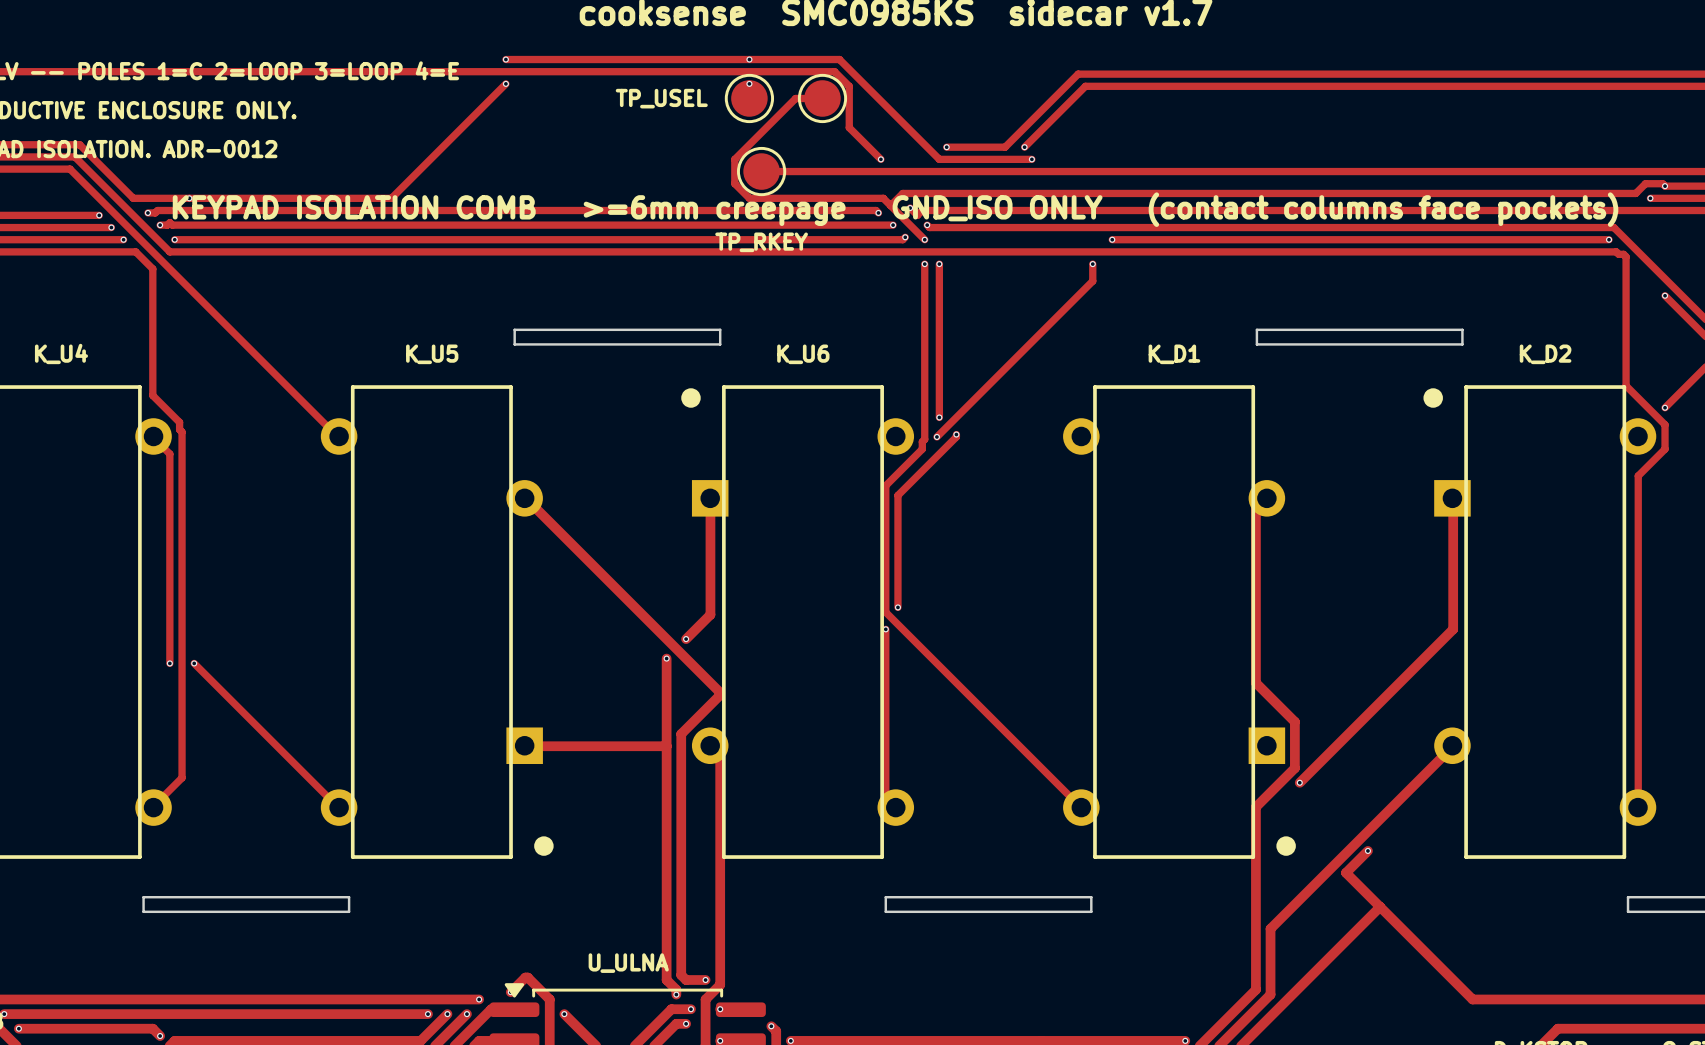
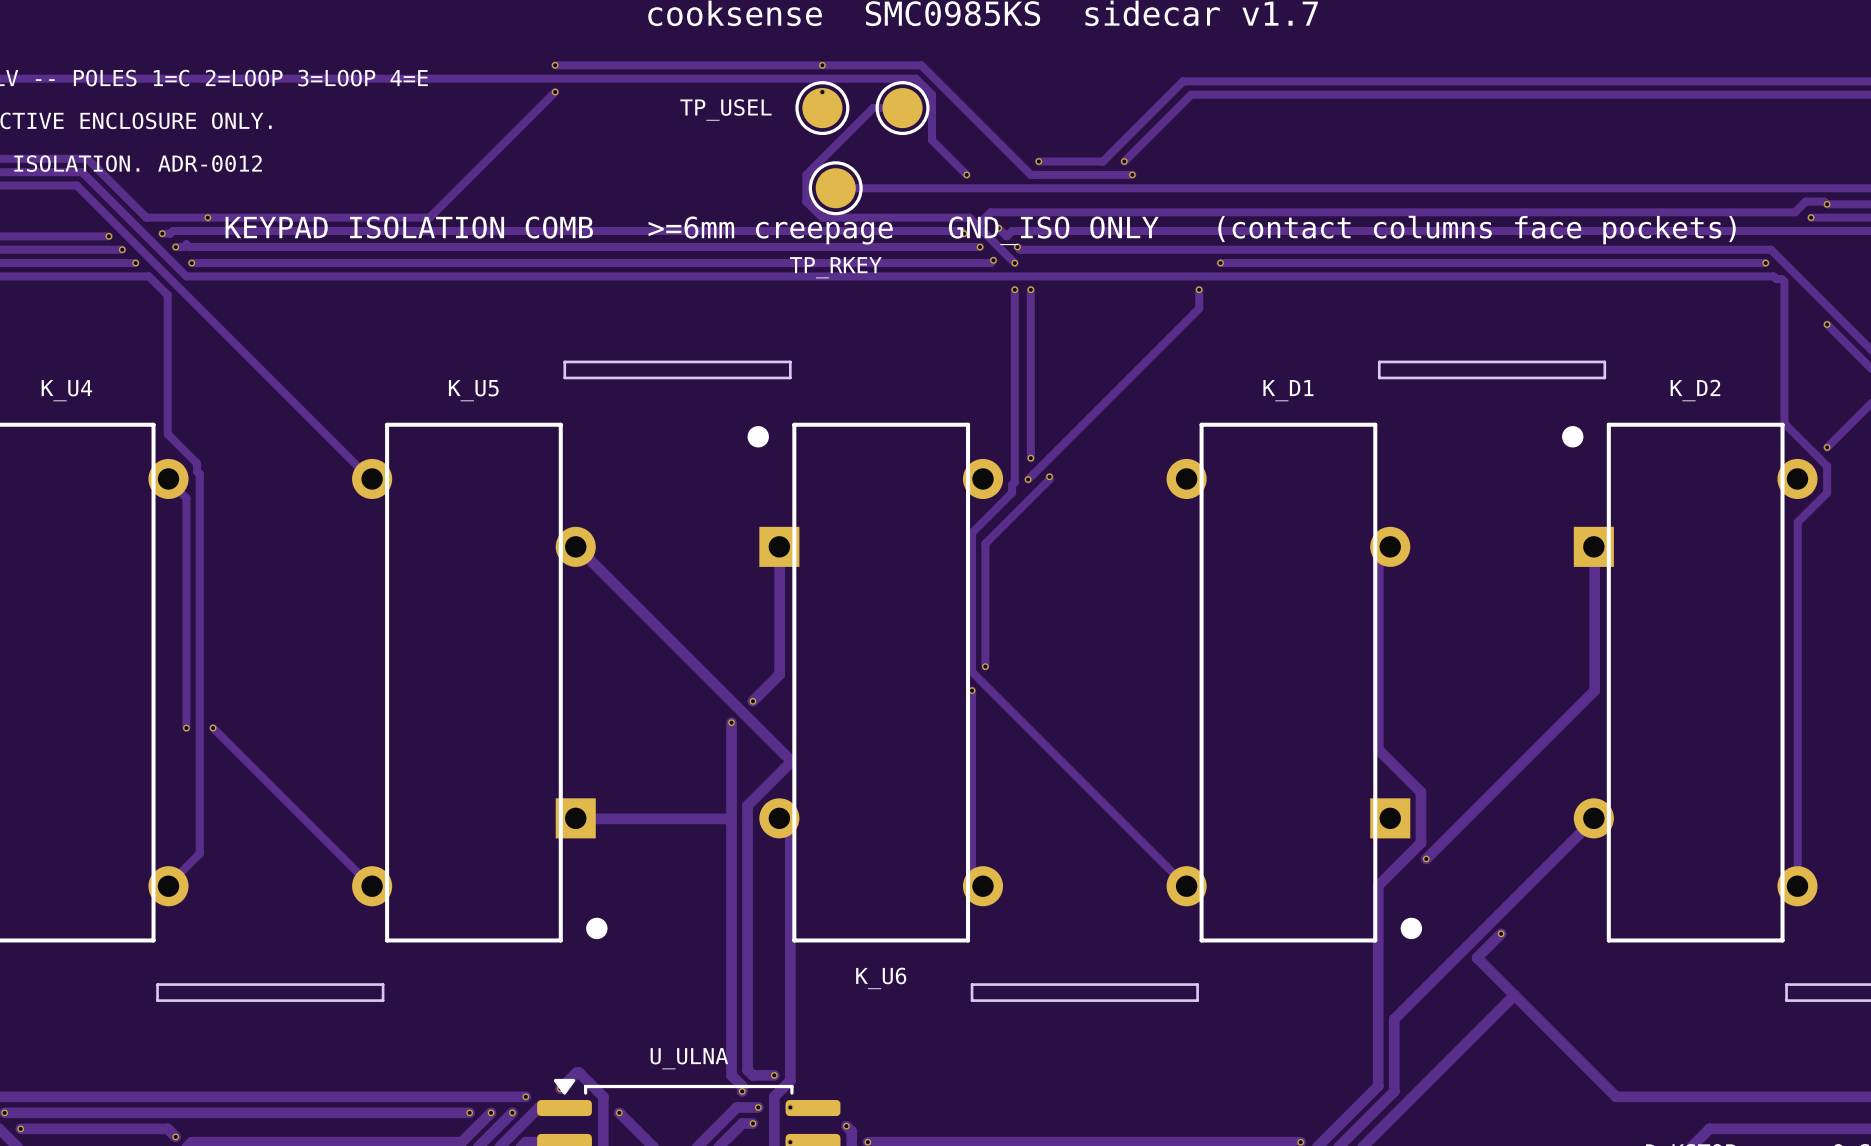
K_U6 name position: K_U6 (803, 354) -> K_U6 (881, 978)

